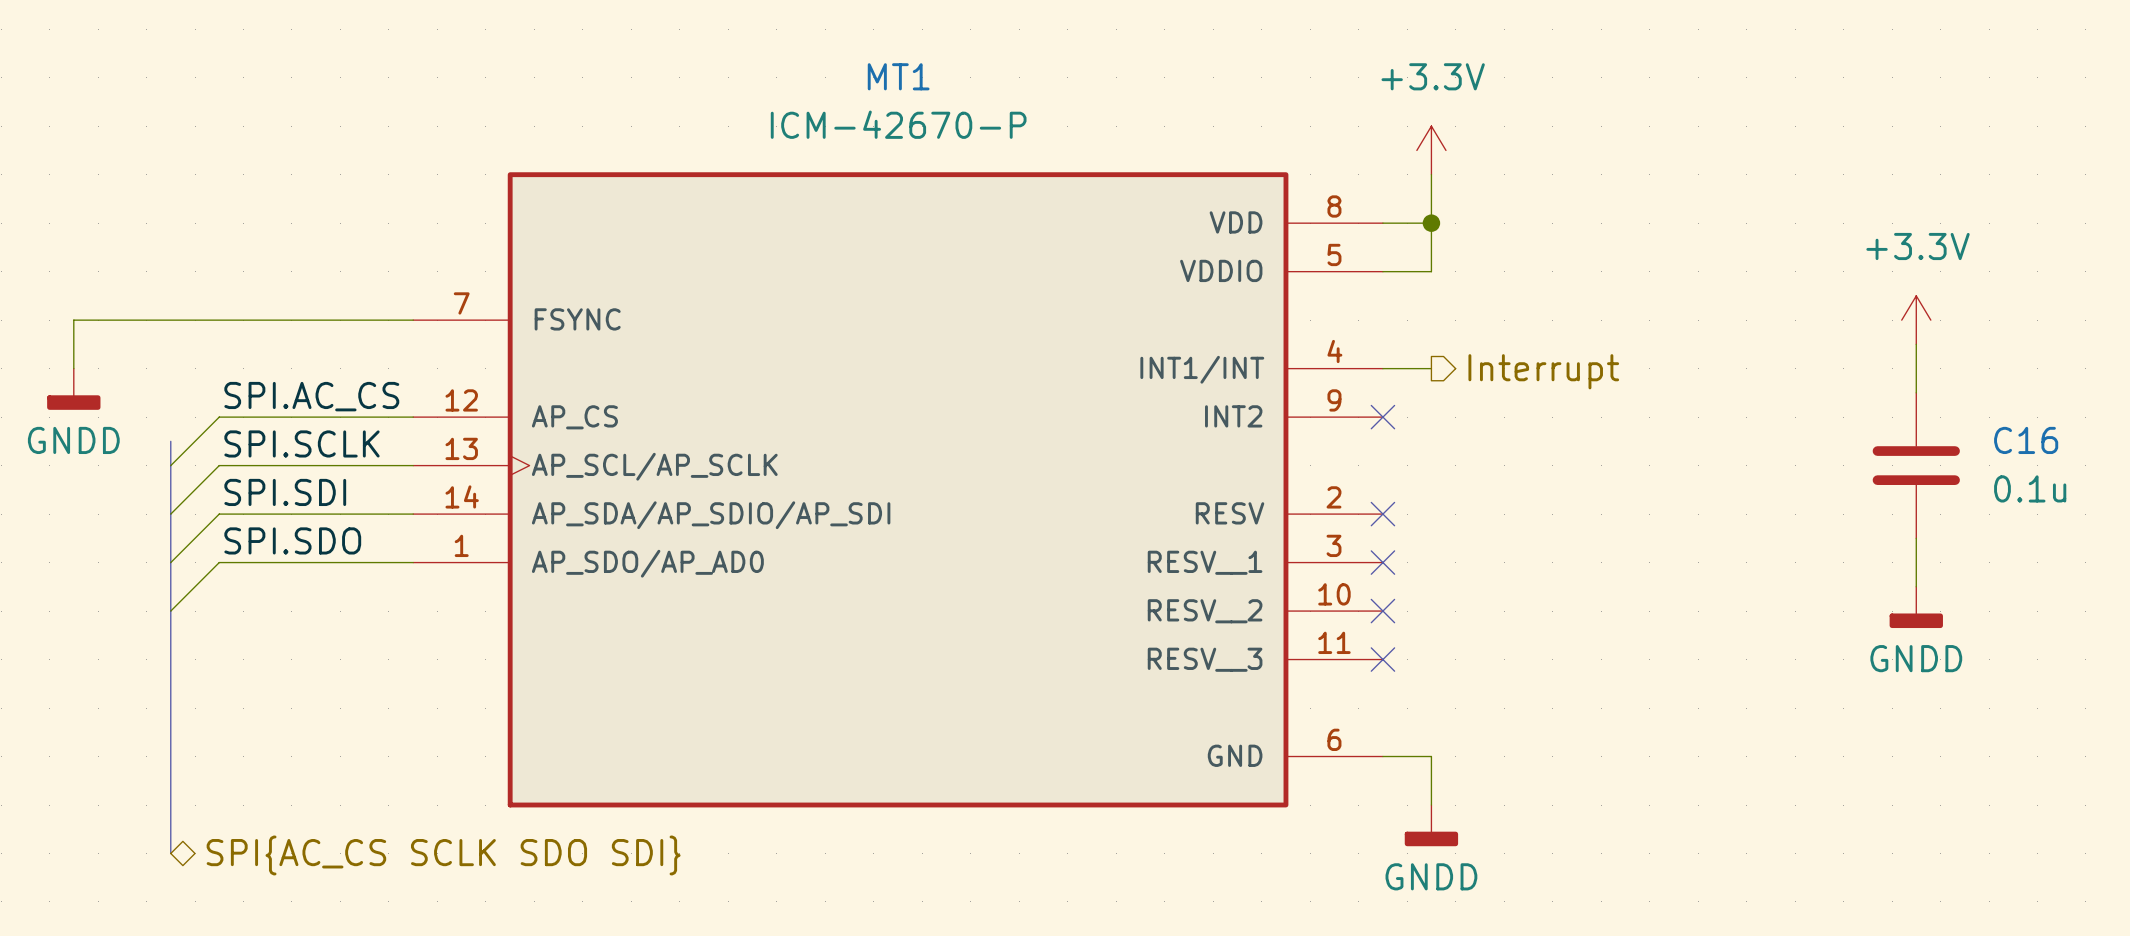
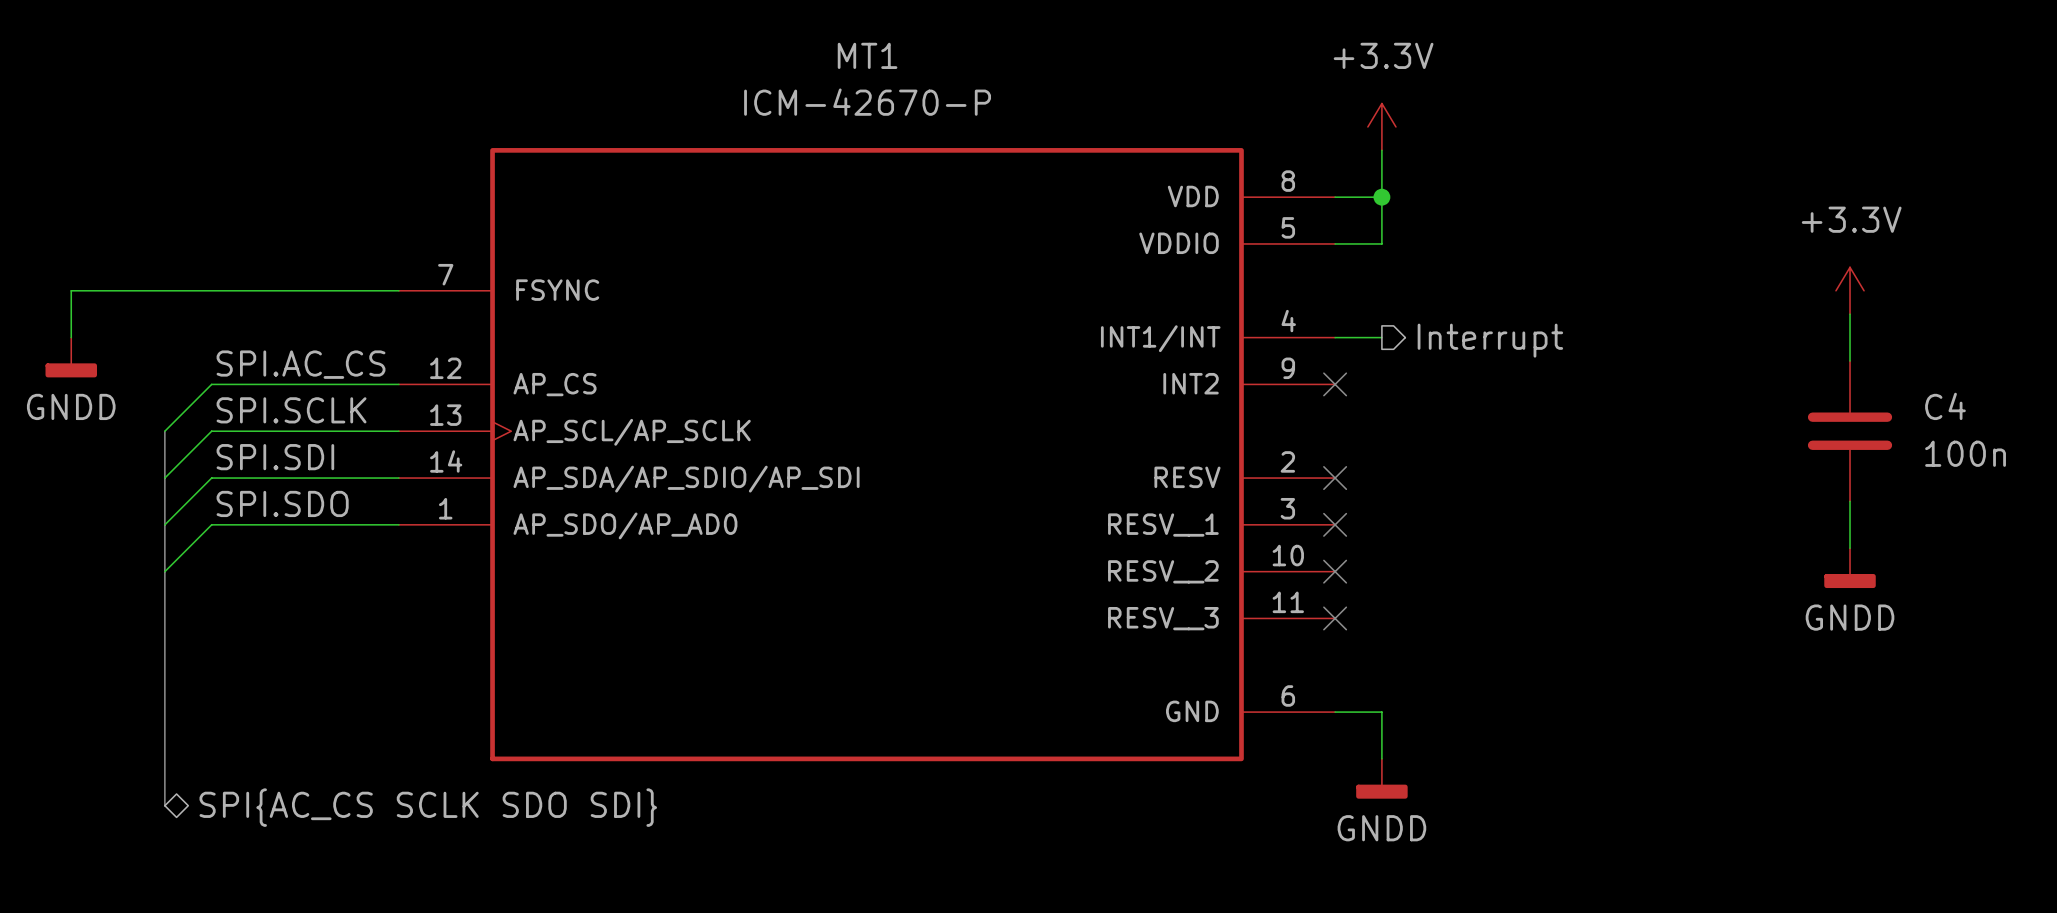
C16 name: C16 (2026, 440) -> C4 (1945, 406)
bus: (170, 441) (170, 465) -> none
C16 value: 0.1u (2030, 488) -> 100n (1965, 453)

